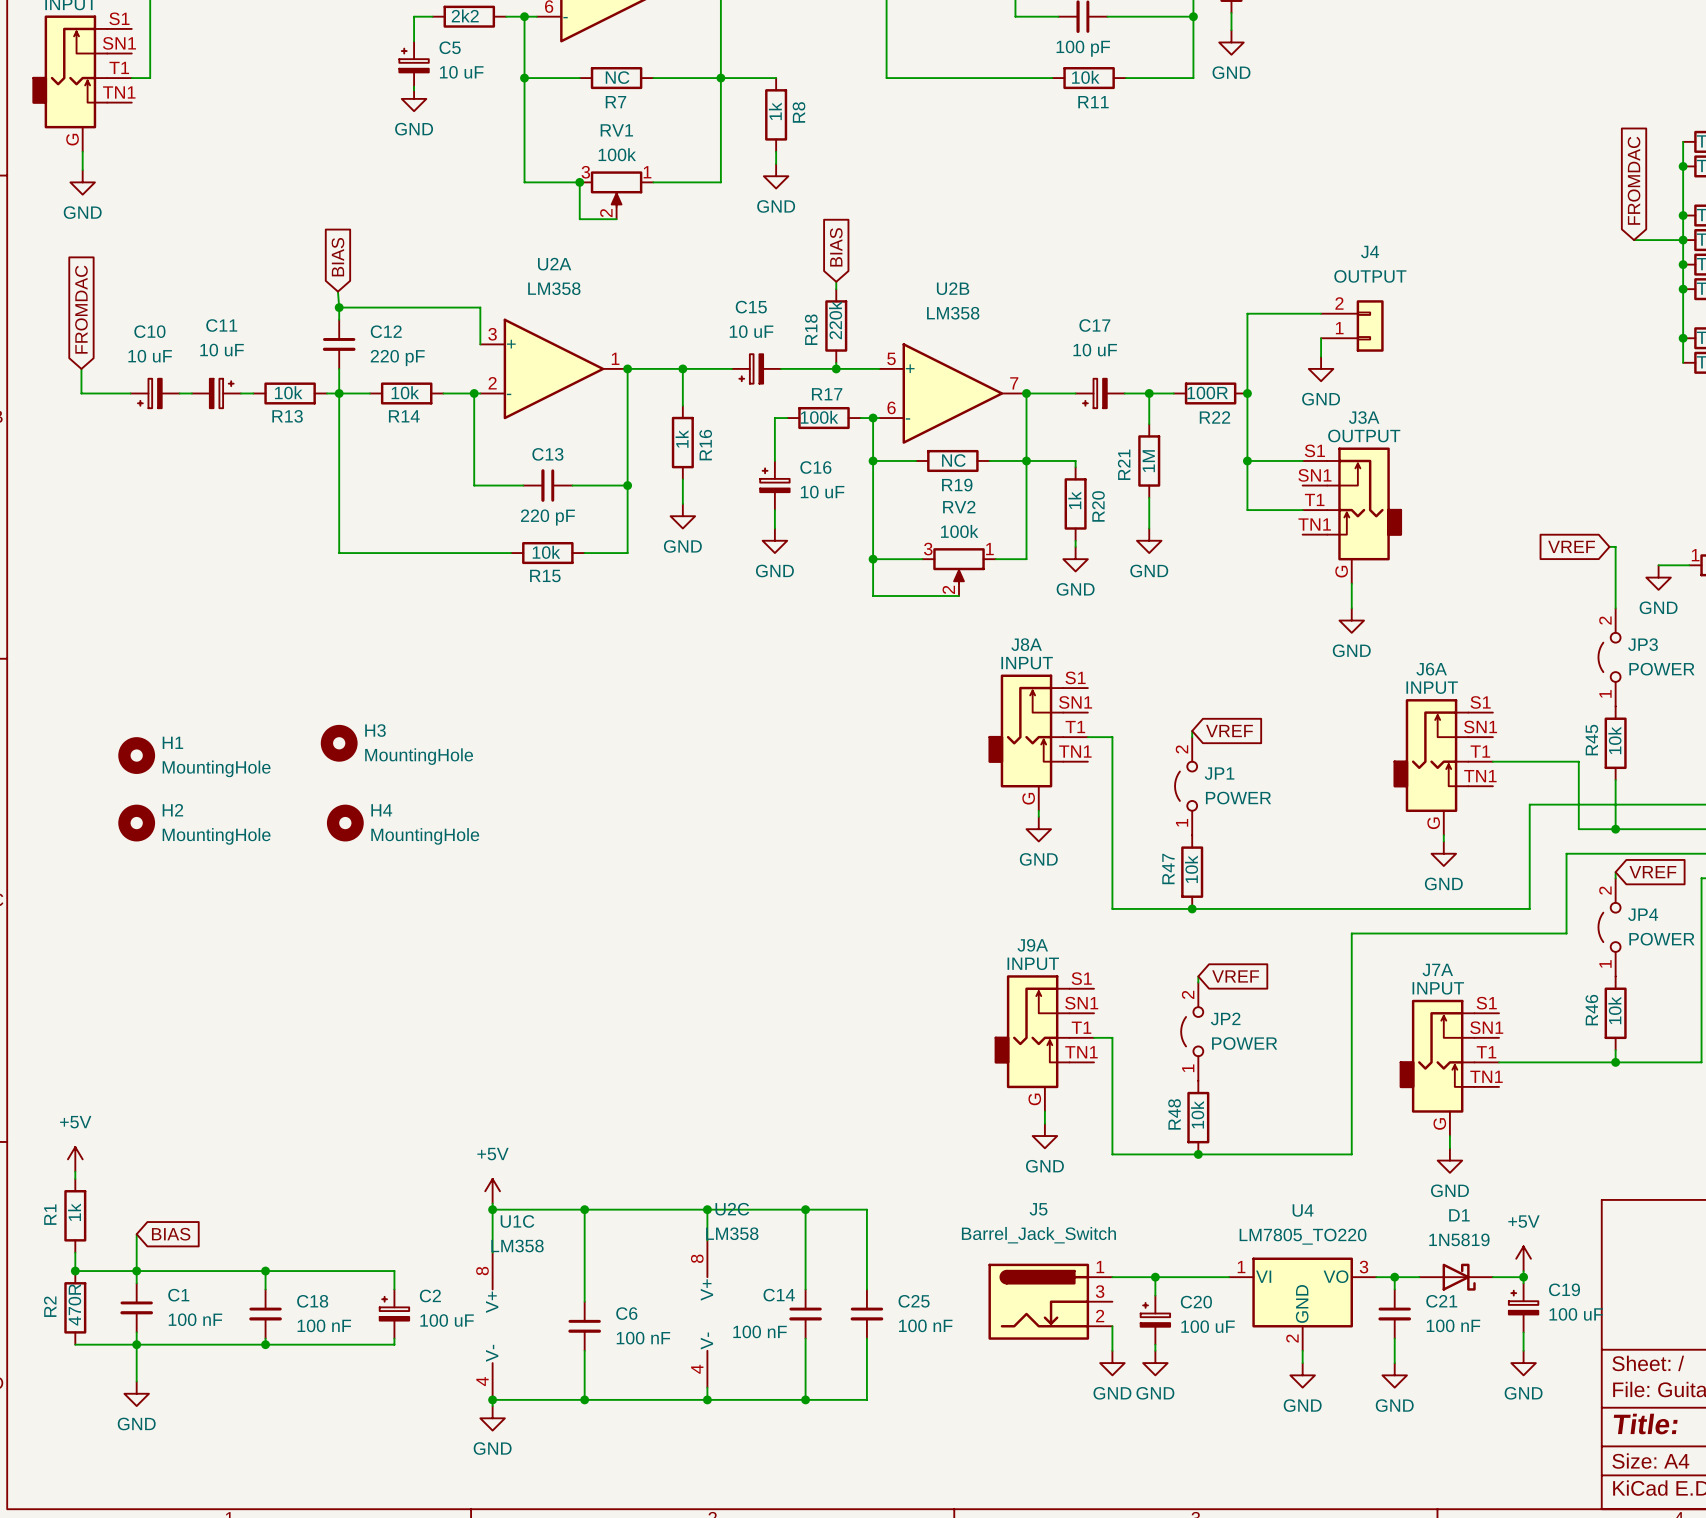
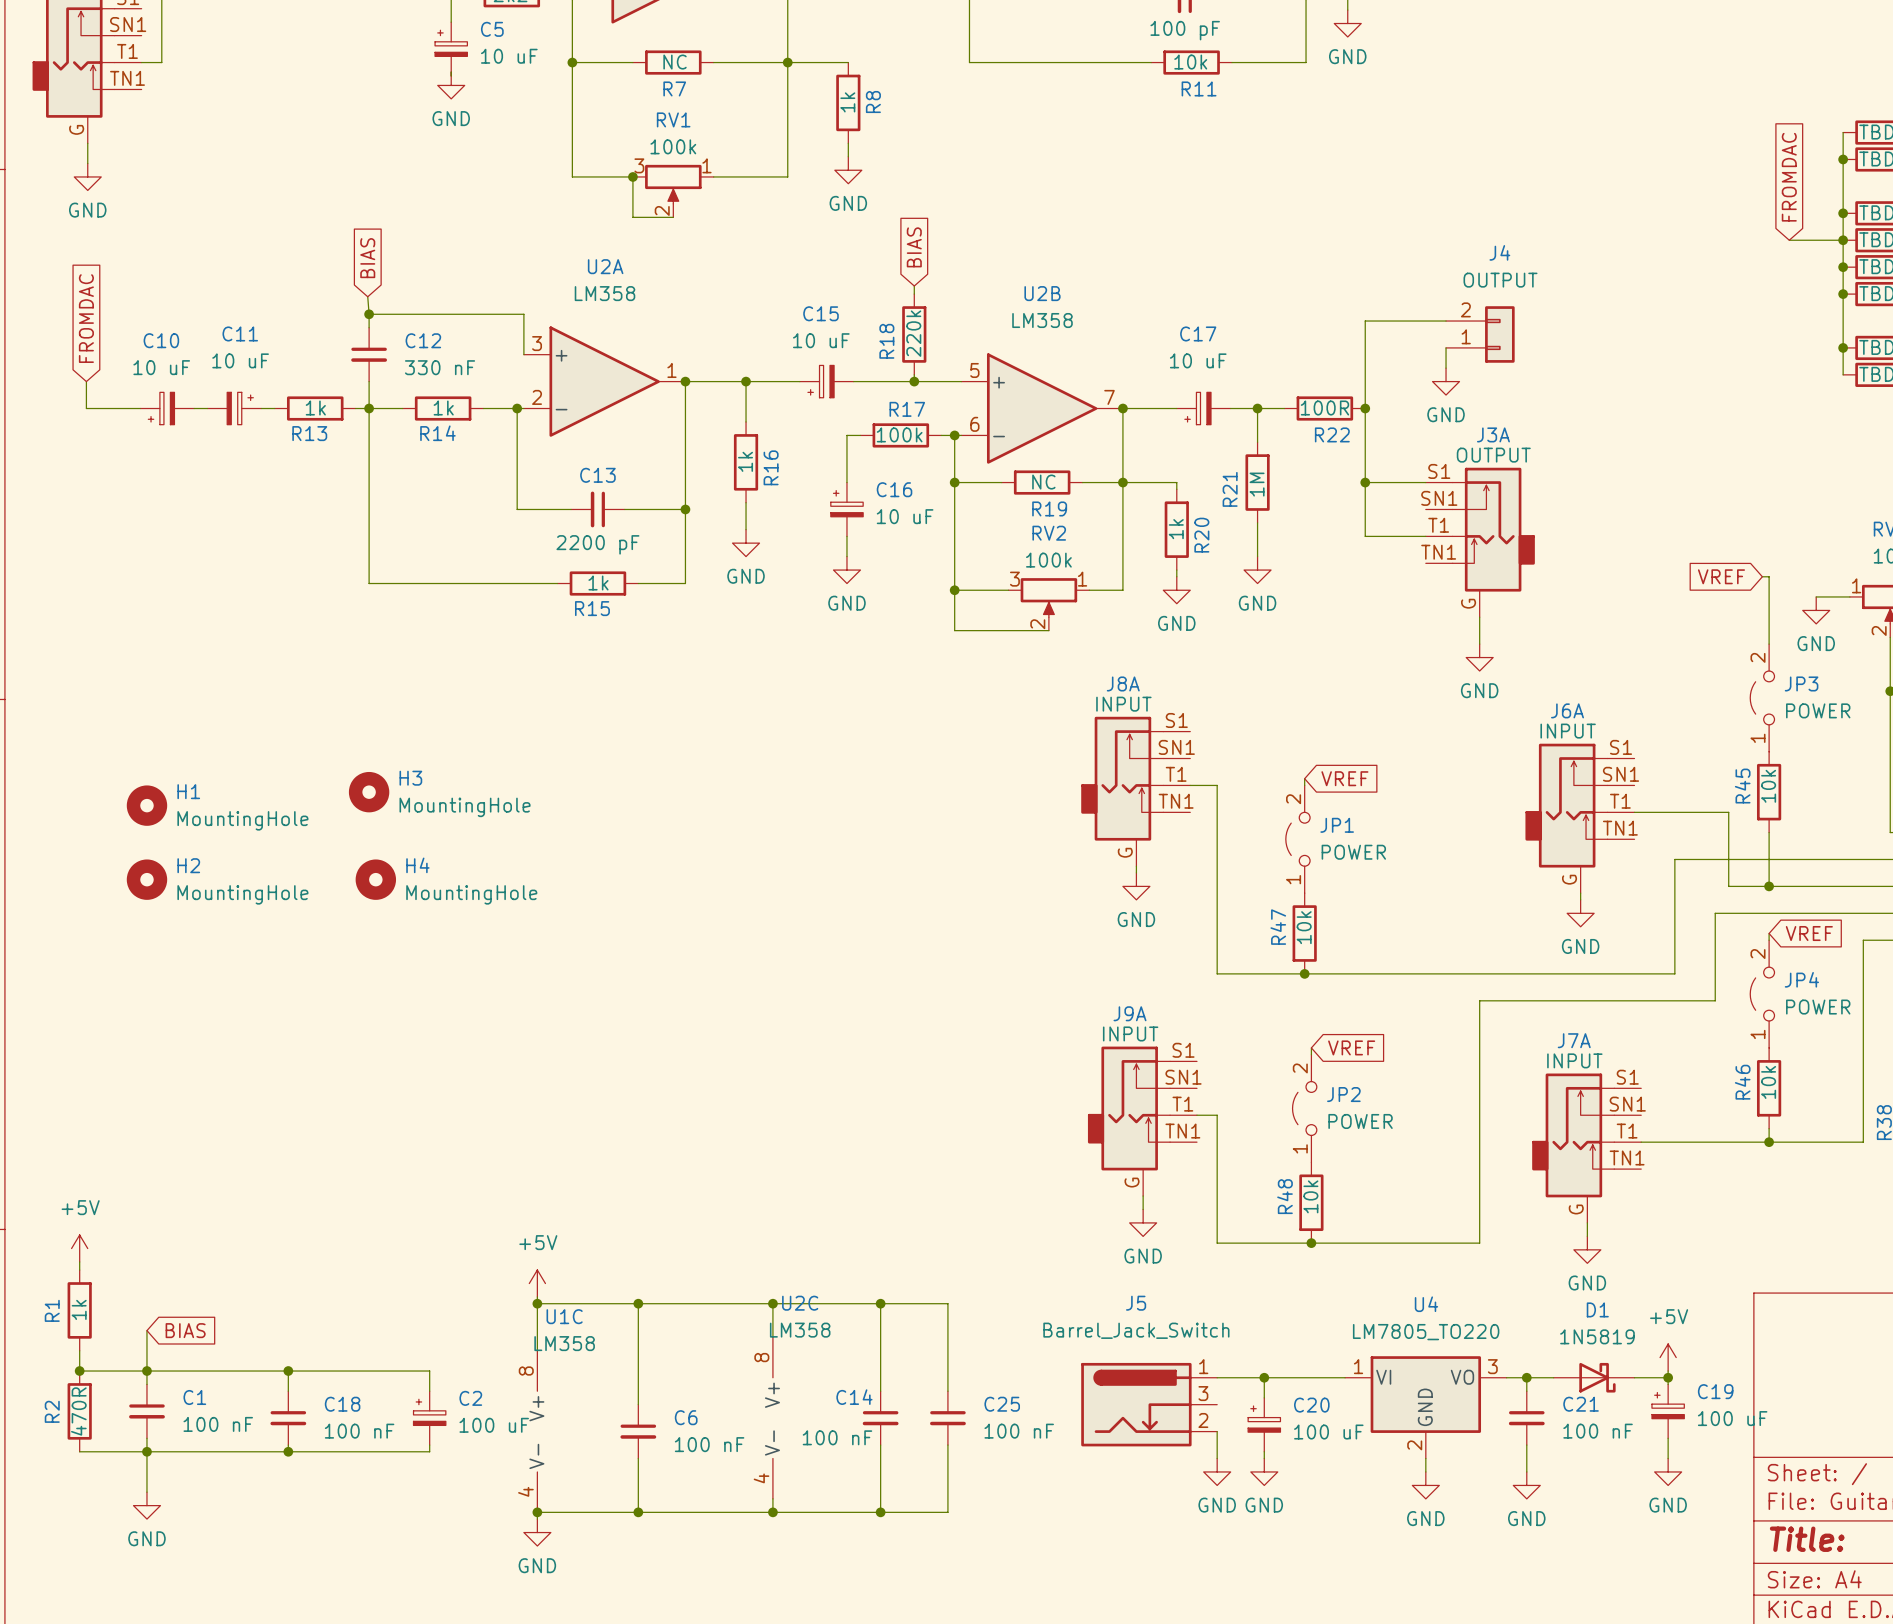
C12 value: 220 pF (397, 358) -> 330 nF (440, 367)
R13 value: 10k (288, 392) -> 1k (315, 408)
R14 value: 10k (405, 392) -> 1k (443, 408)
C13 value: 220 pF (547, 517) -> 2200 pF (597, 544)
R15 value: 10k (546, 552) -> 1k (598, 583)

